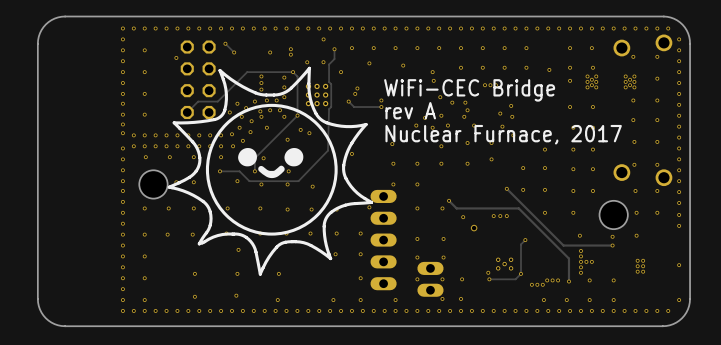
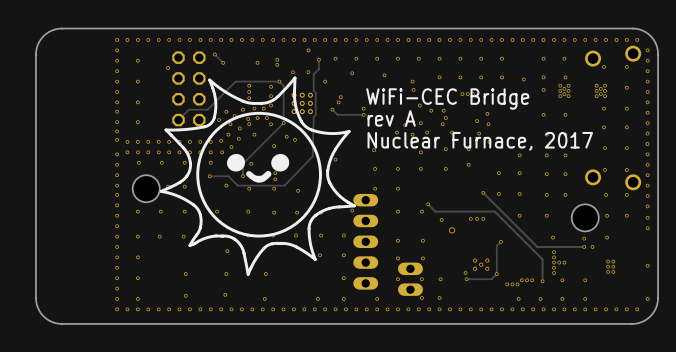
via: none -> (275, 173)
via: (288, 171) -> none
via: none -> (275, 179)
via: none -> (592, 246)

